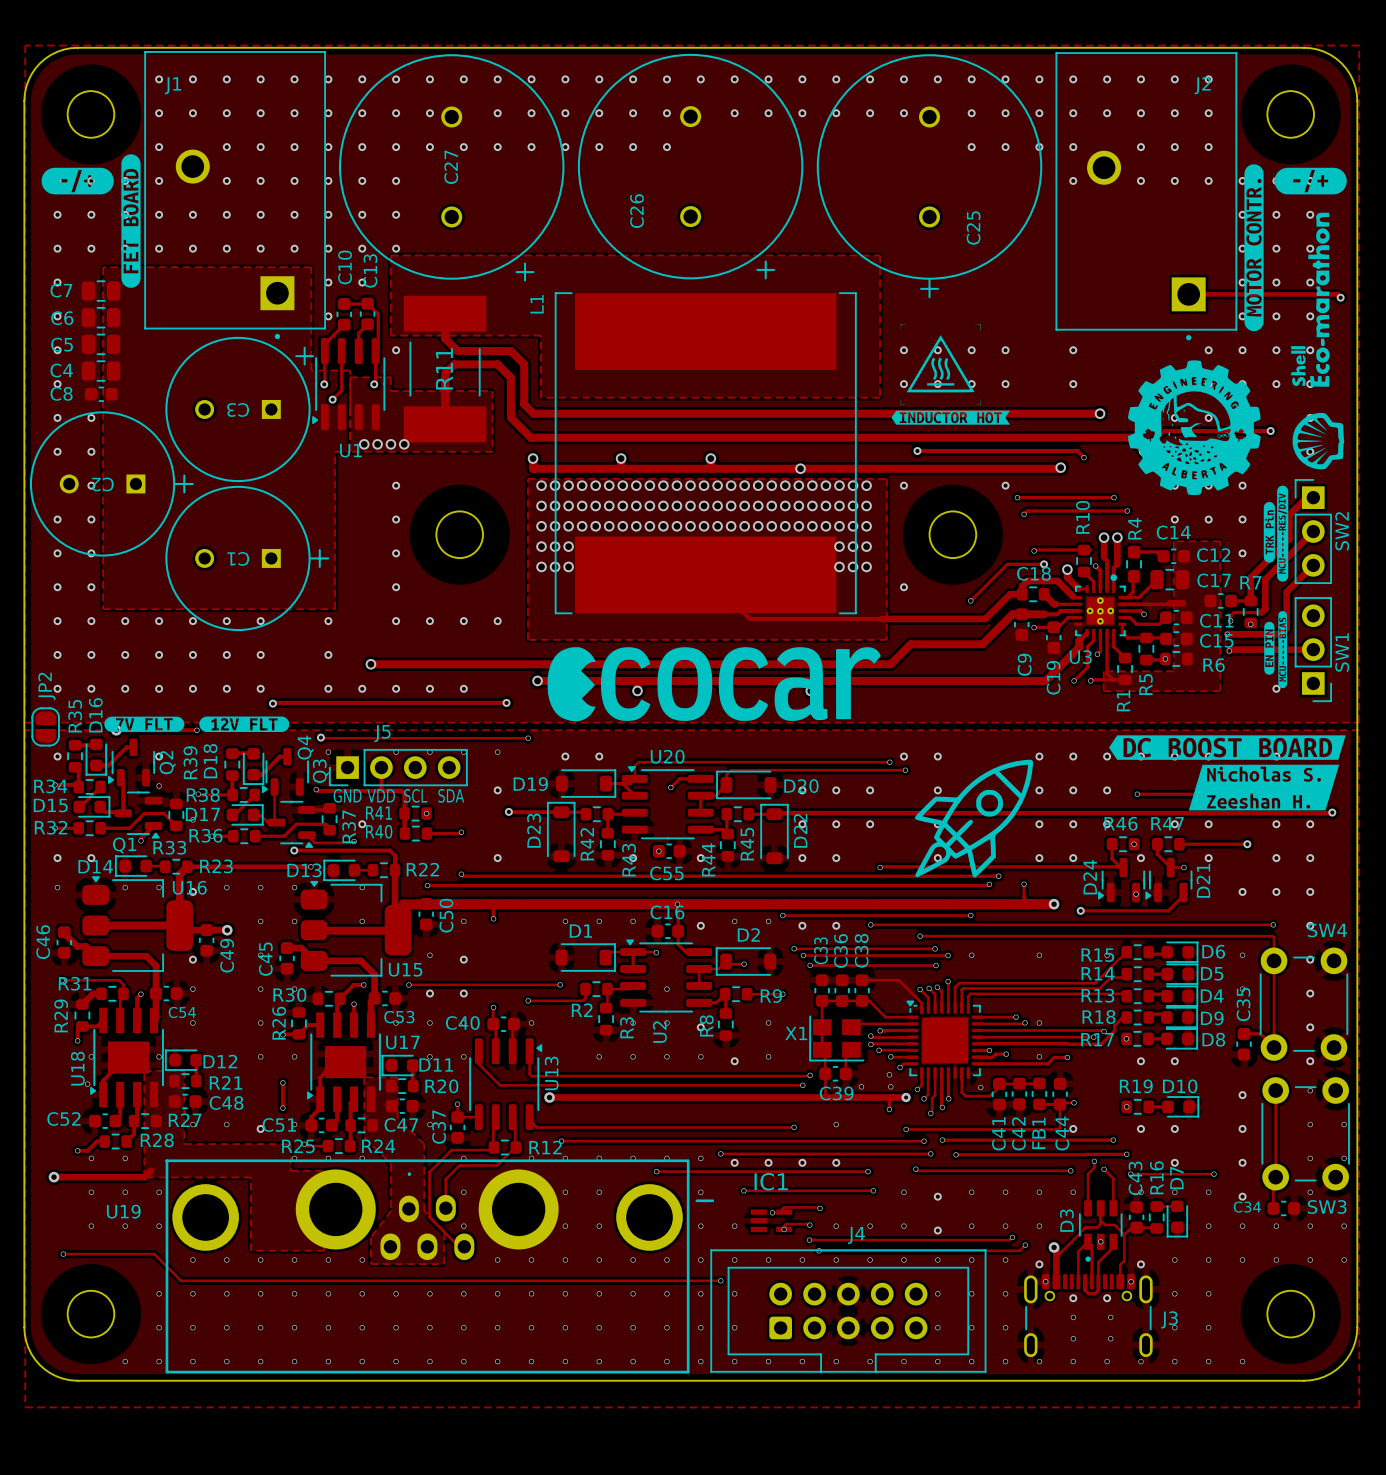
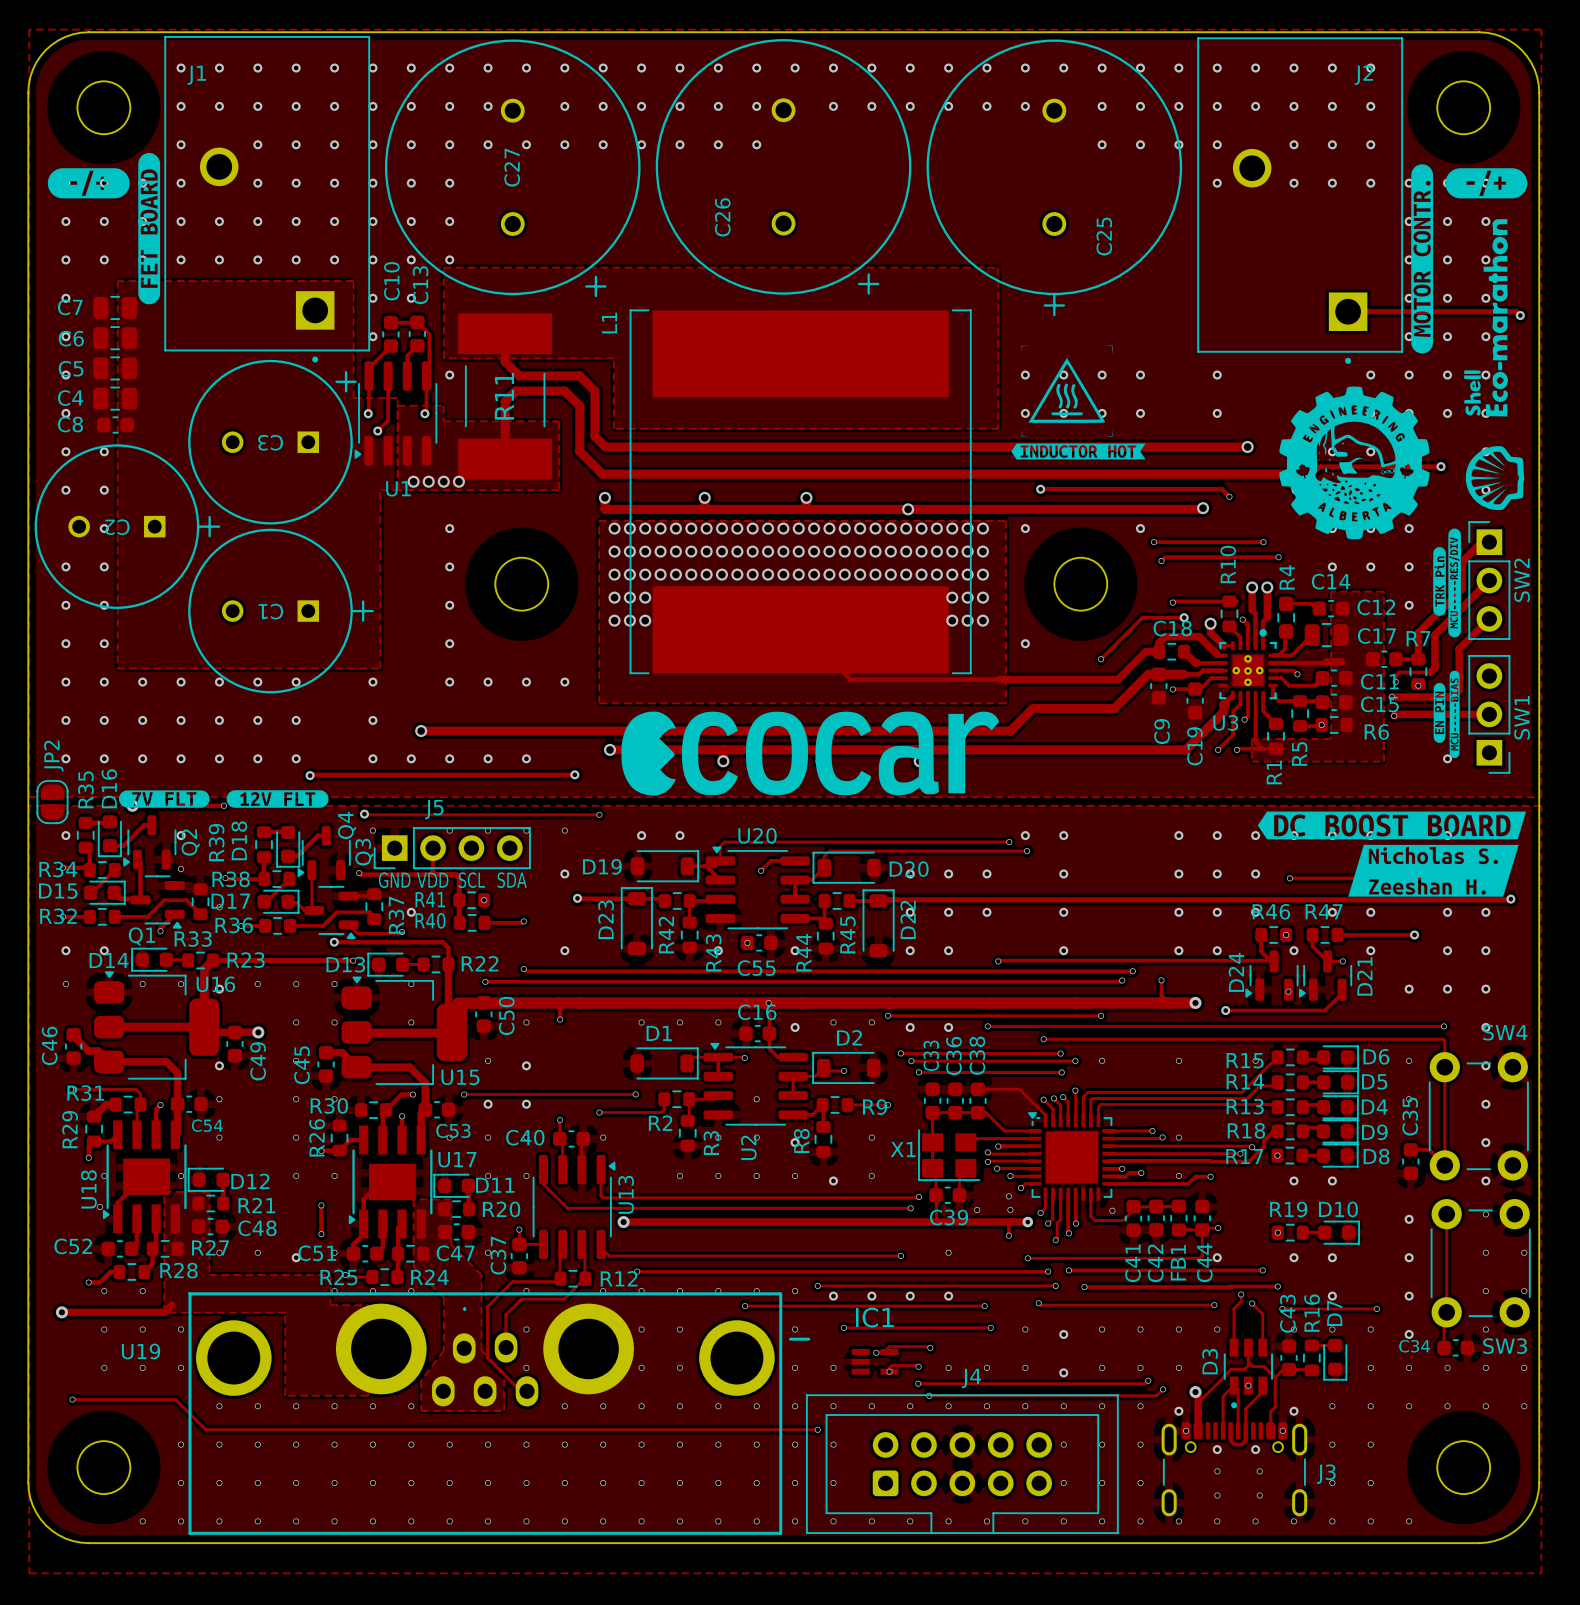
drawing: [914, 759, 1034, 878] -> none

